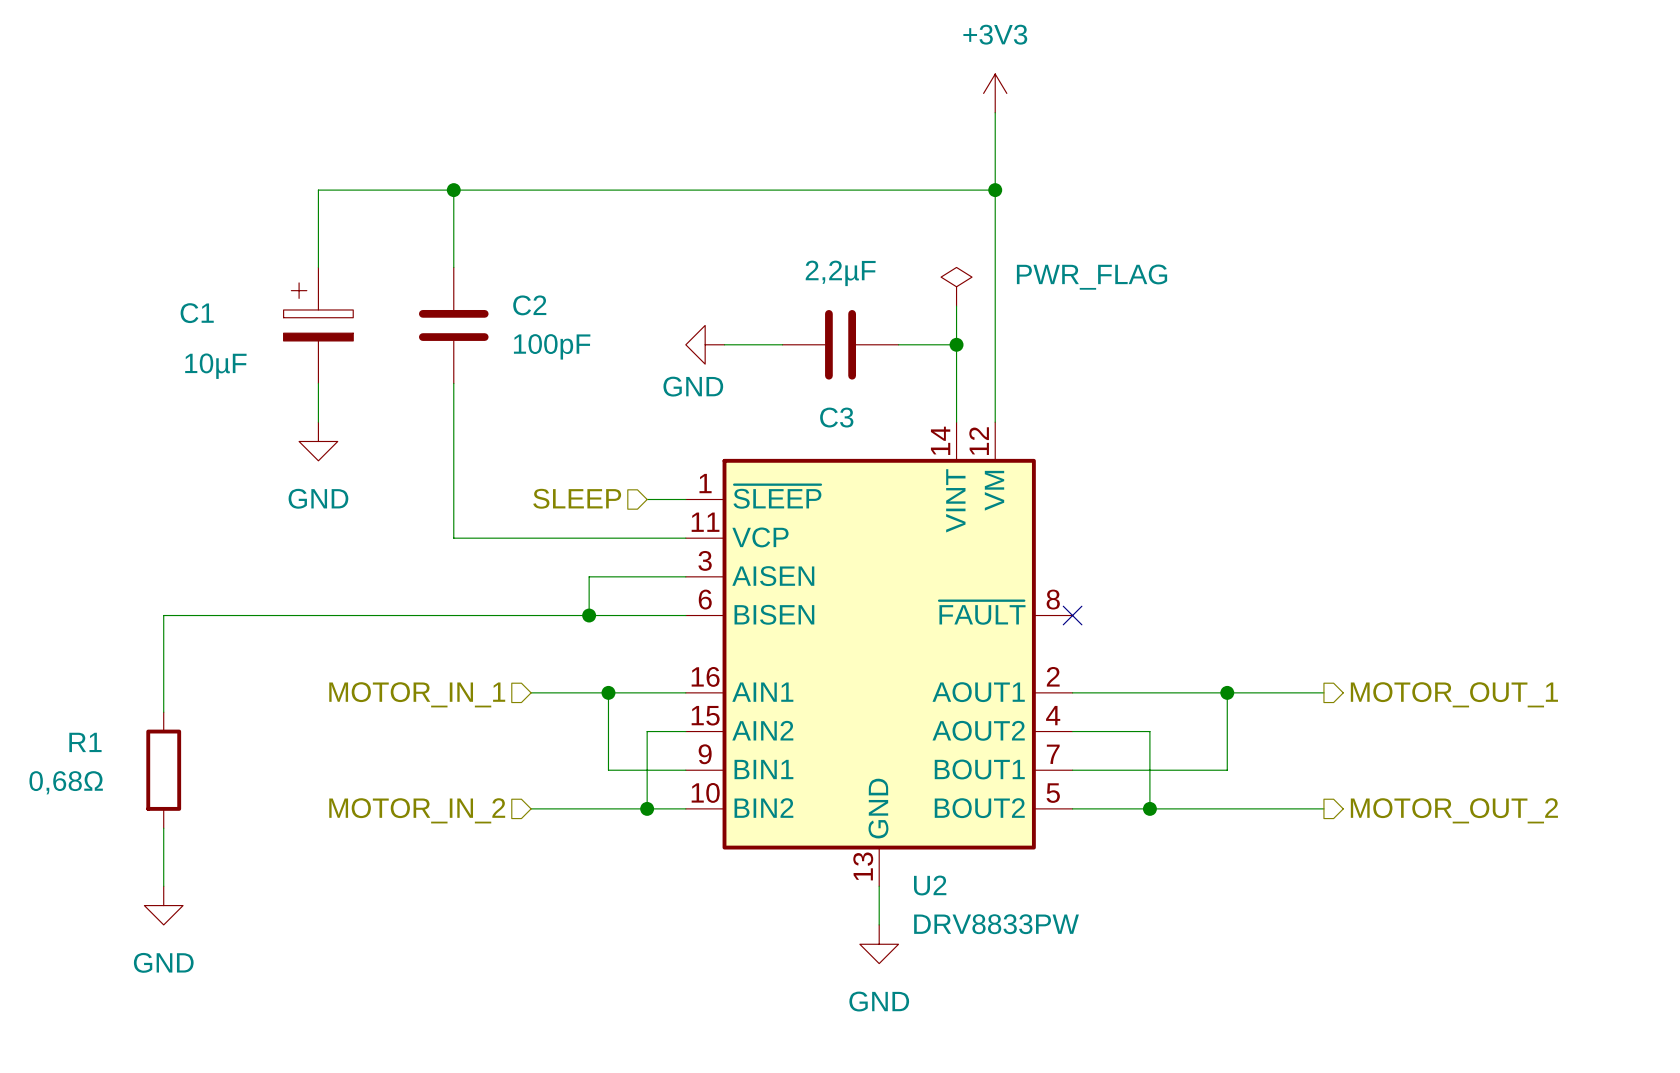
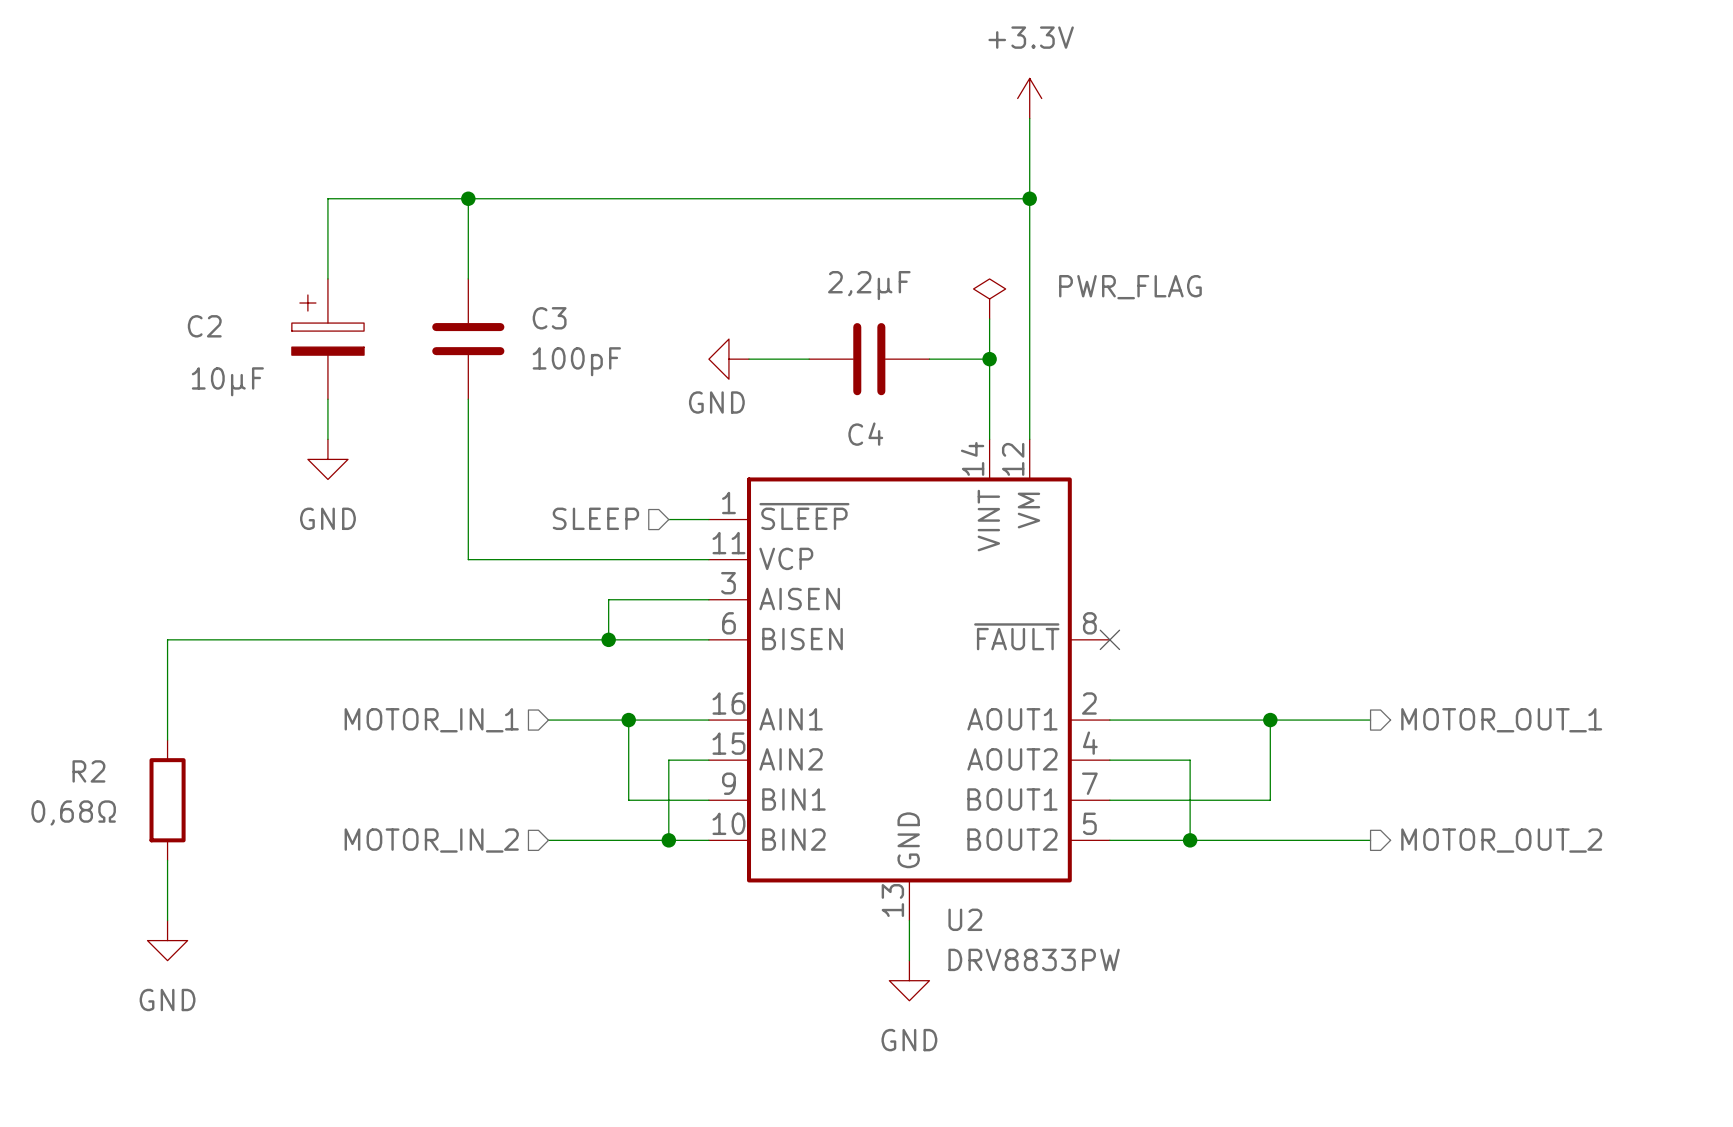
power symbol: +3V3 (995, 93) -> +3.3V (1029, 98)
C2 name: C2 (529, 305) -> C3 (549, 318)
C1 name: C1 (197, 313) -> C2 (204, 326)
C3 name: C3 (836, 417) -> C4 (865, 434)
R1 name: R1 (85, 742) -> R2 (88, 771)

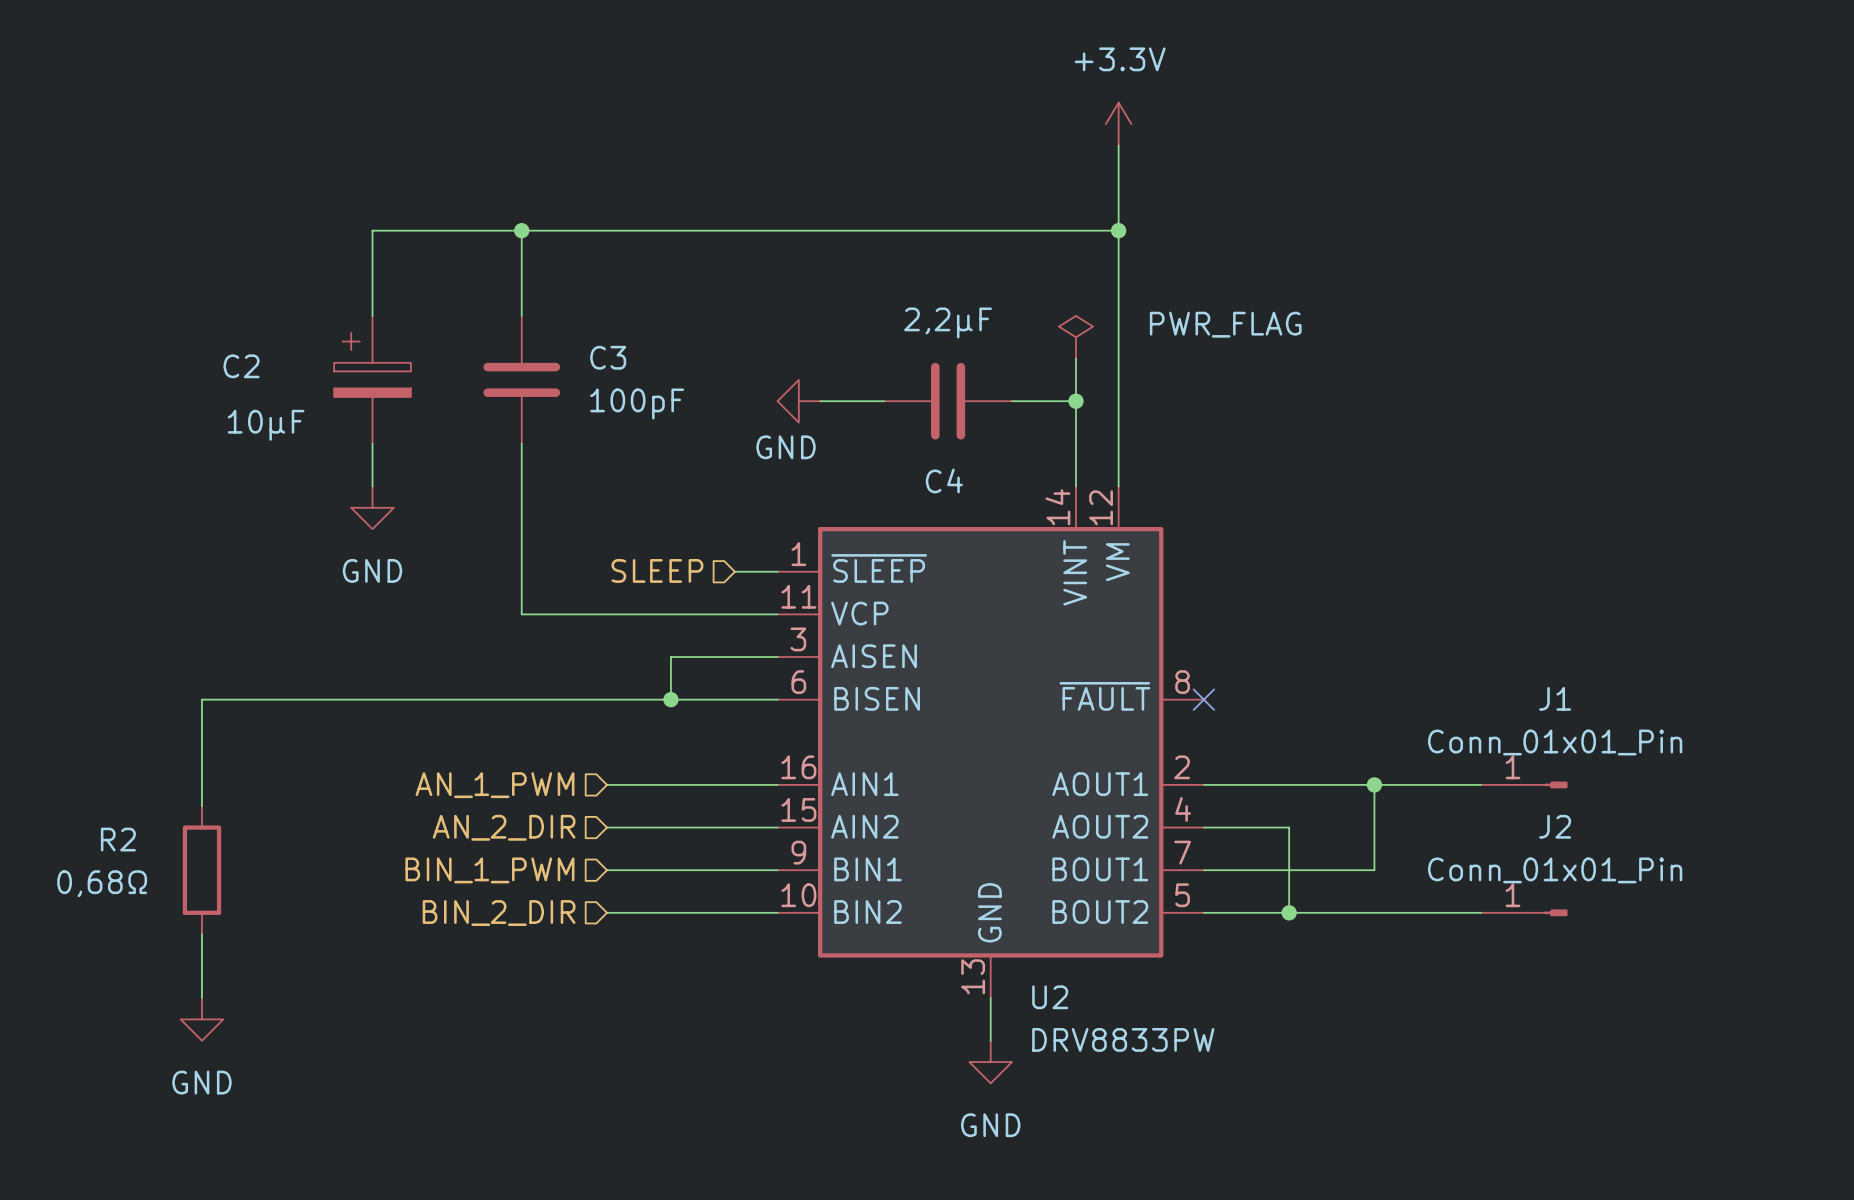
hierarchical label: MOTOR_IN_1 (431, 720) -> AN_1_PWM (495, 785)
wire: (628, 720) (628, 800) -> (607, 870) (692, 870)
junction: (628, 720) -> none
J1: none -> Conn_01x01_Pin (1524, 784)
hierarchical label: MOTOR_OUT_1 (1501, 720) -> none
hierarchical label: none -> AN_2_DIR (504, 827)
wire: (668, 760) (668, 840) -> (734, 827) (607, 827)
hierarchical label: none -> BIN_1_PWM (489, 870)
hierarchical label: MOTOR_IN_2 (431, 840) -> BIN_2_DIR (499, 913)
junction: (668, 840) -> none
J2: none -> Conn_01x01_Pin (1524, 912)
hierarchical label: MOTOR_OUT_2 (1501, 840) -> none

